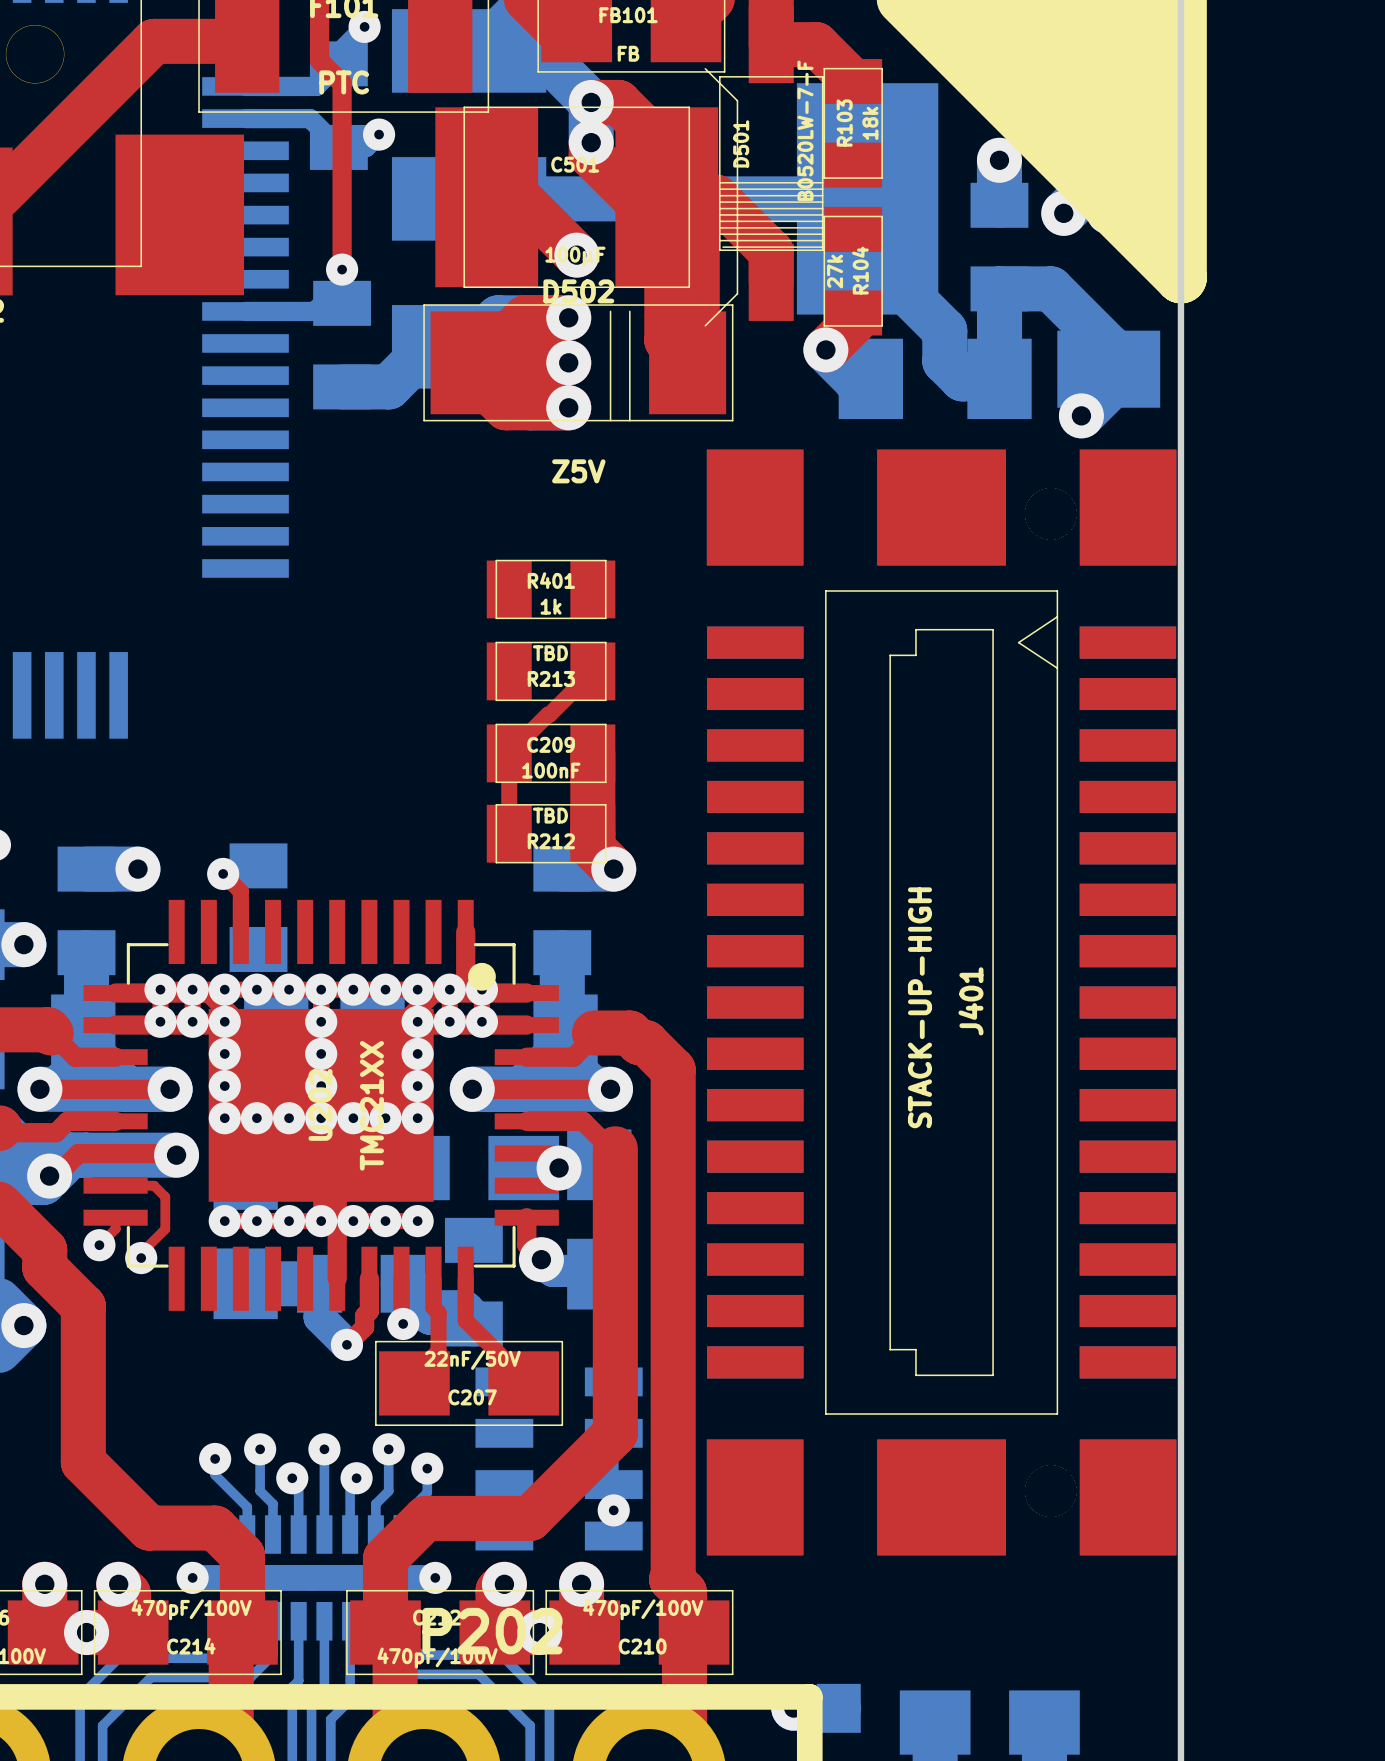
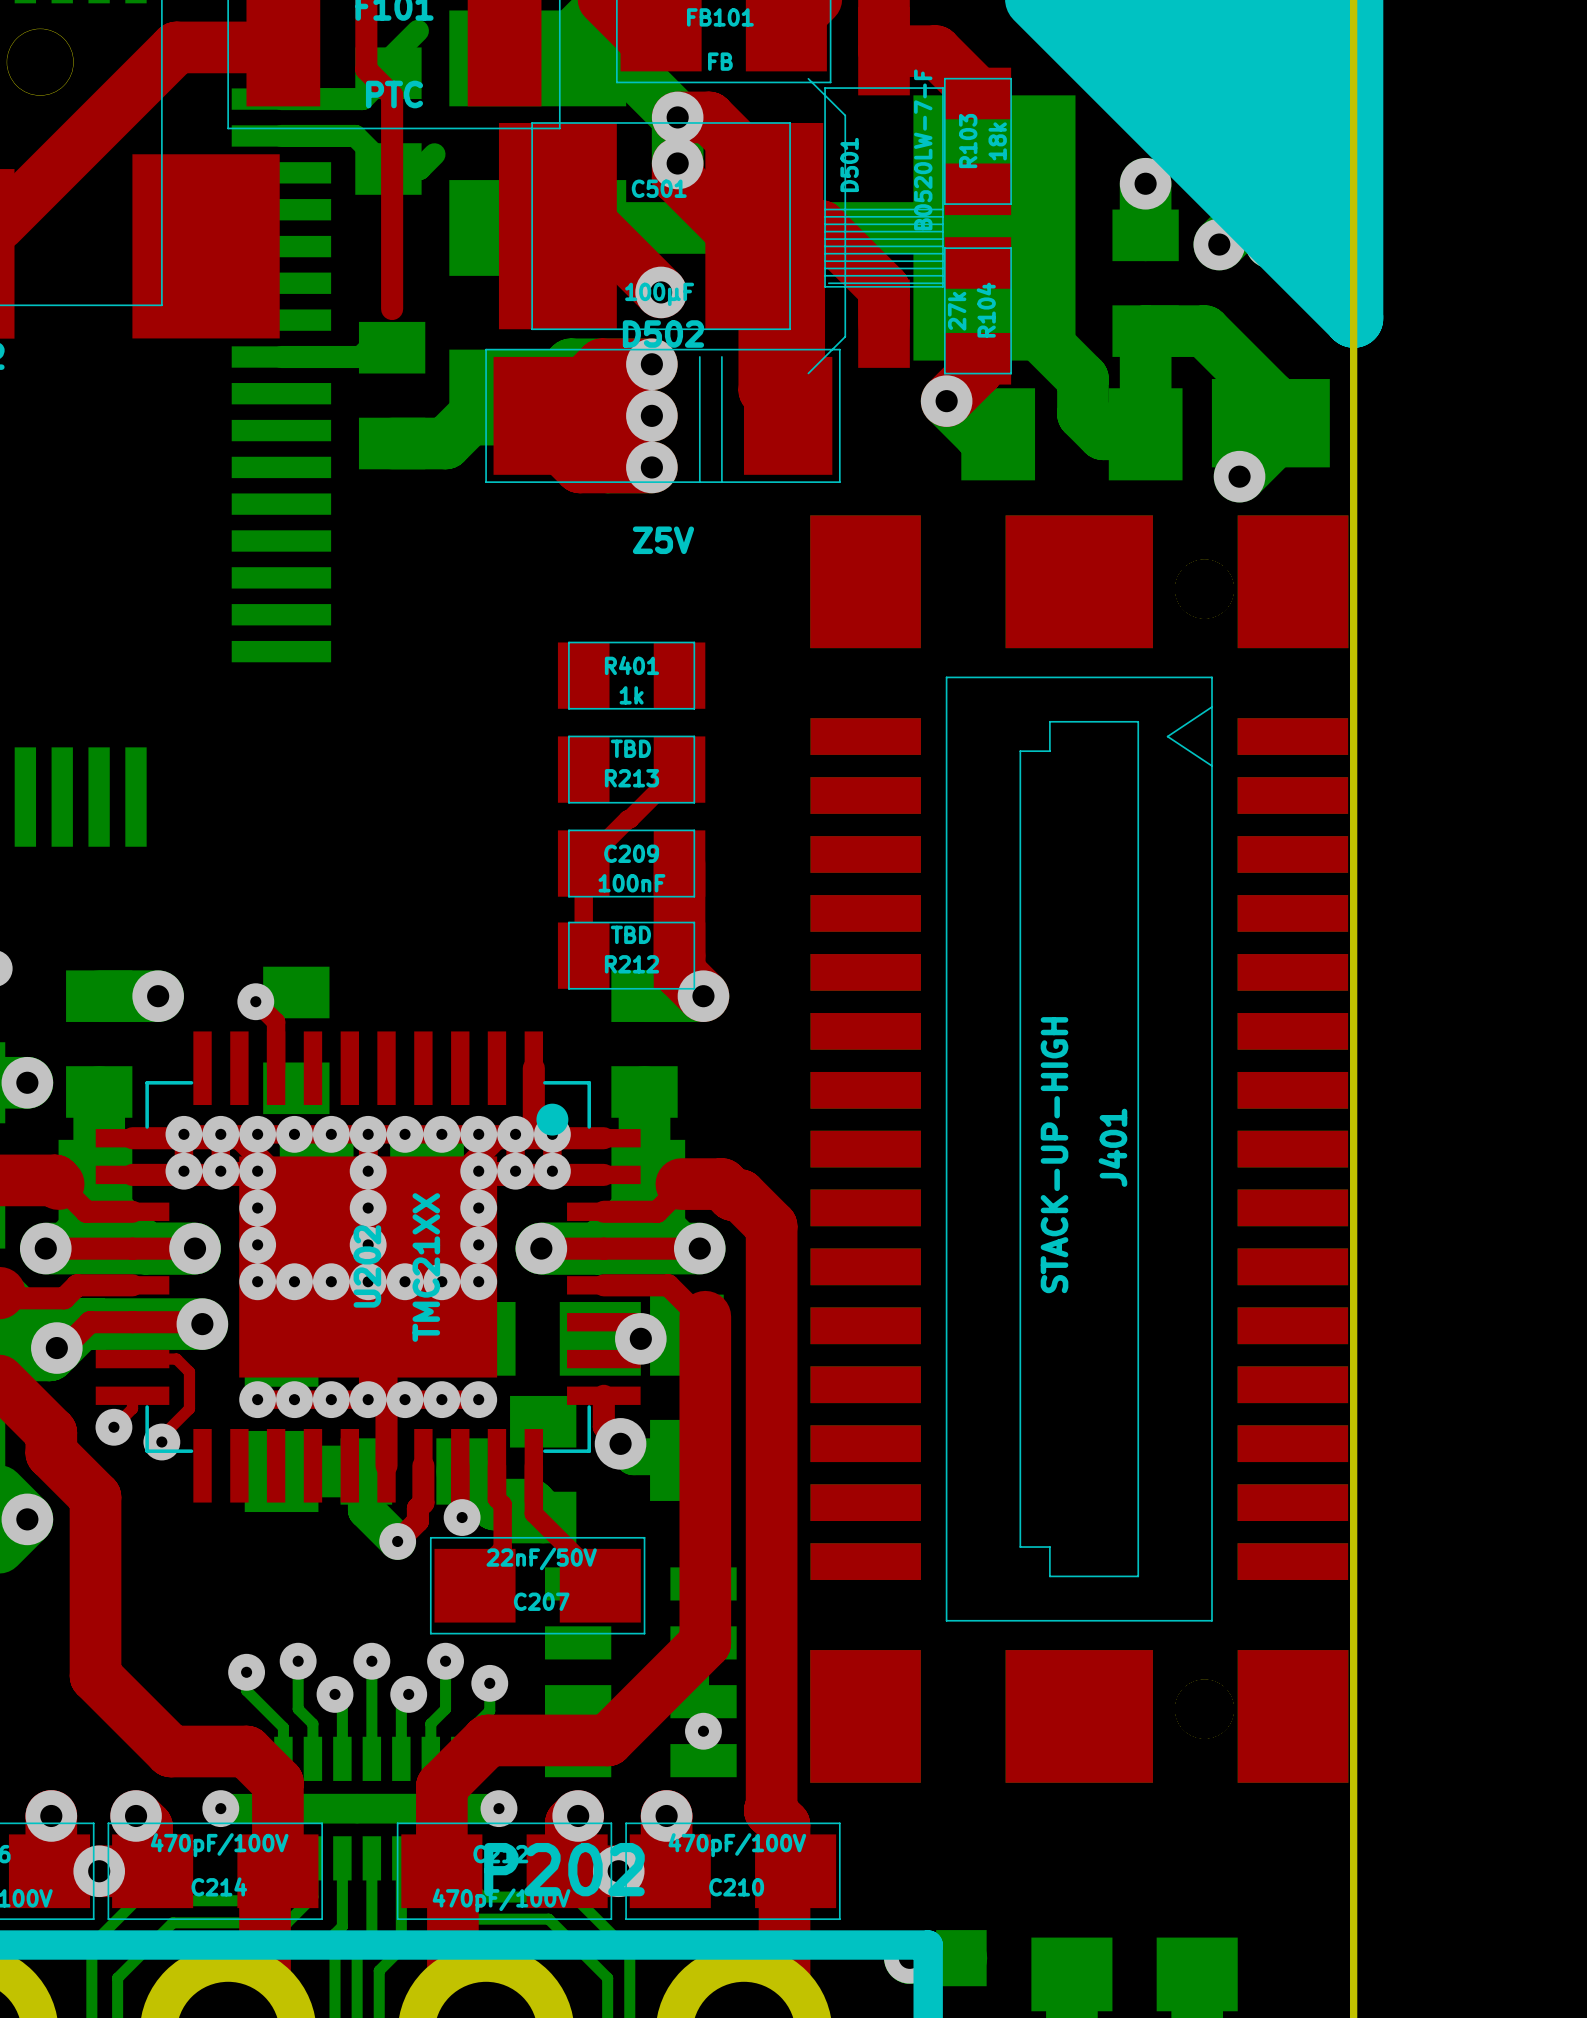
via: (364, 26) -> none
via: (379, 134) -> none
via: (342, 269) -> none

